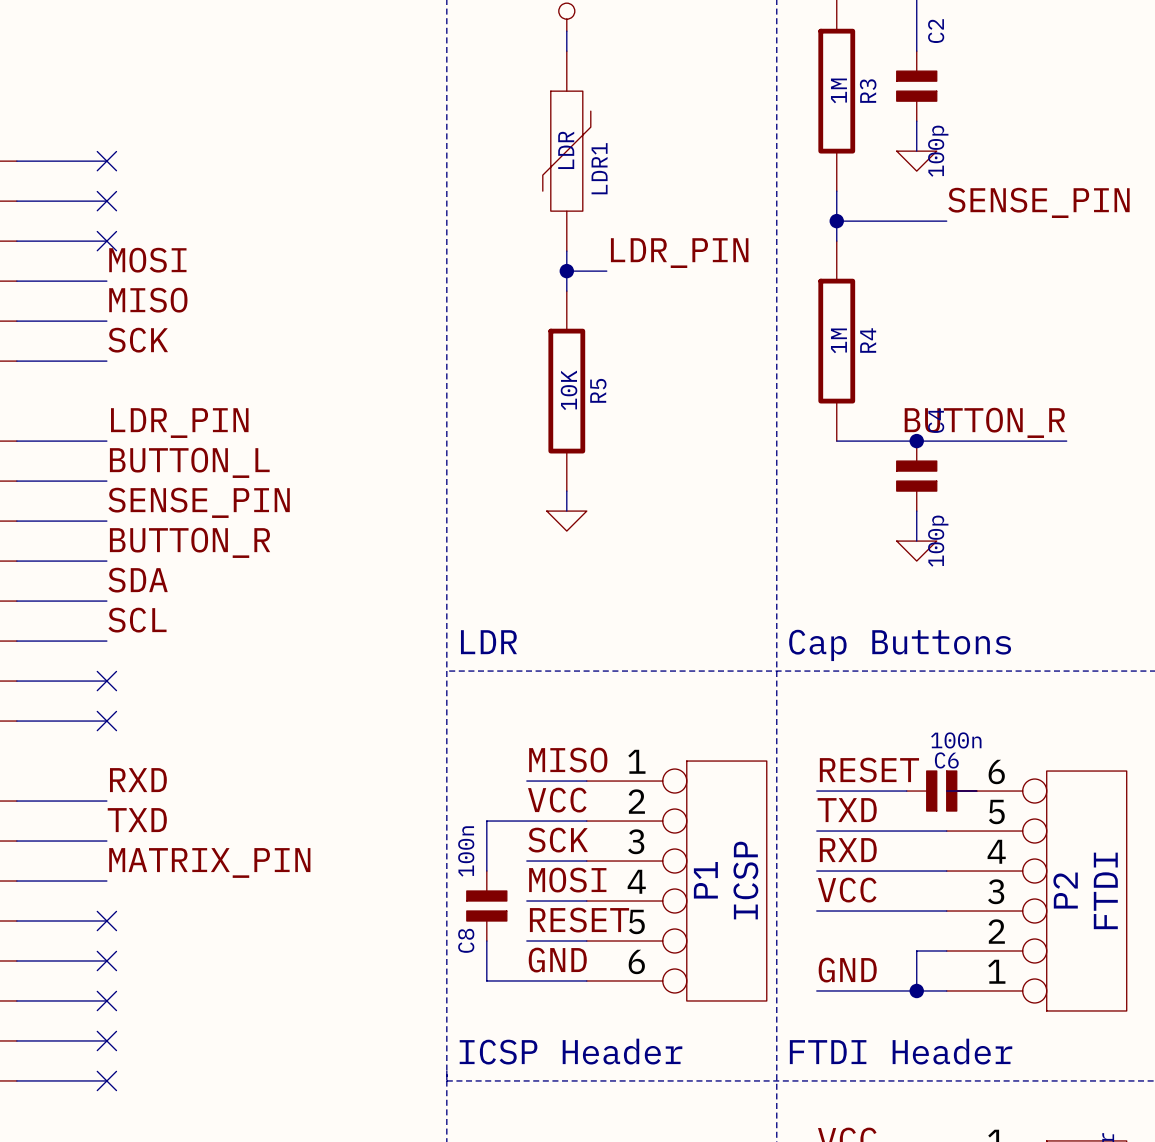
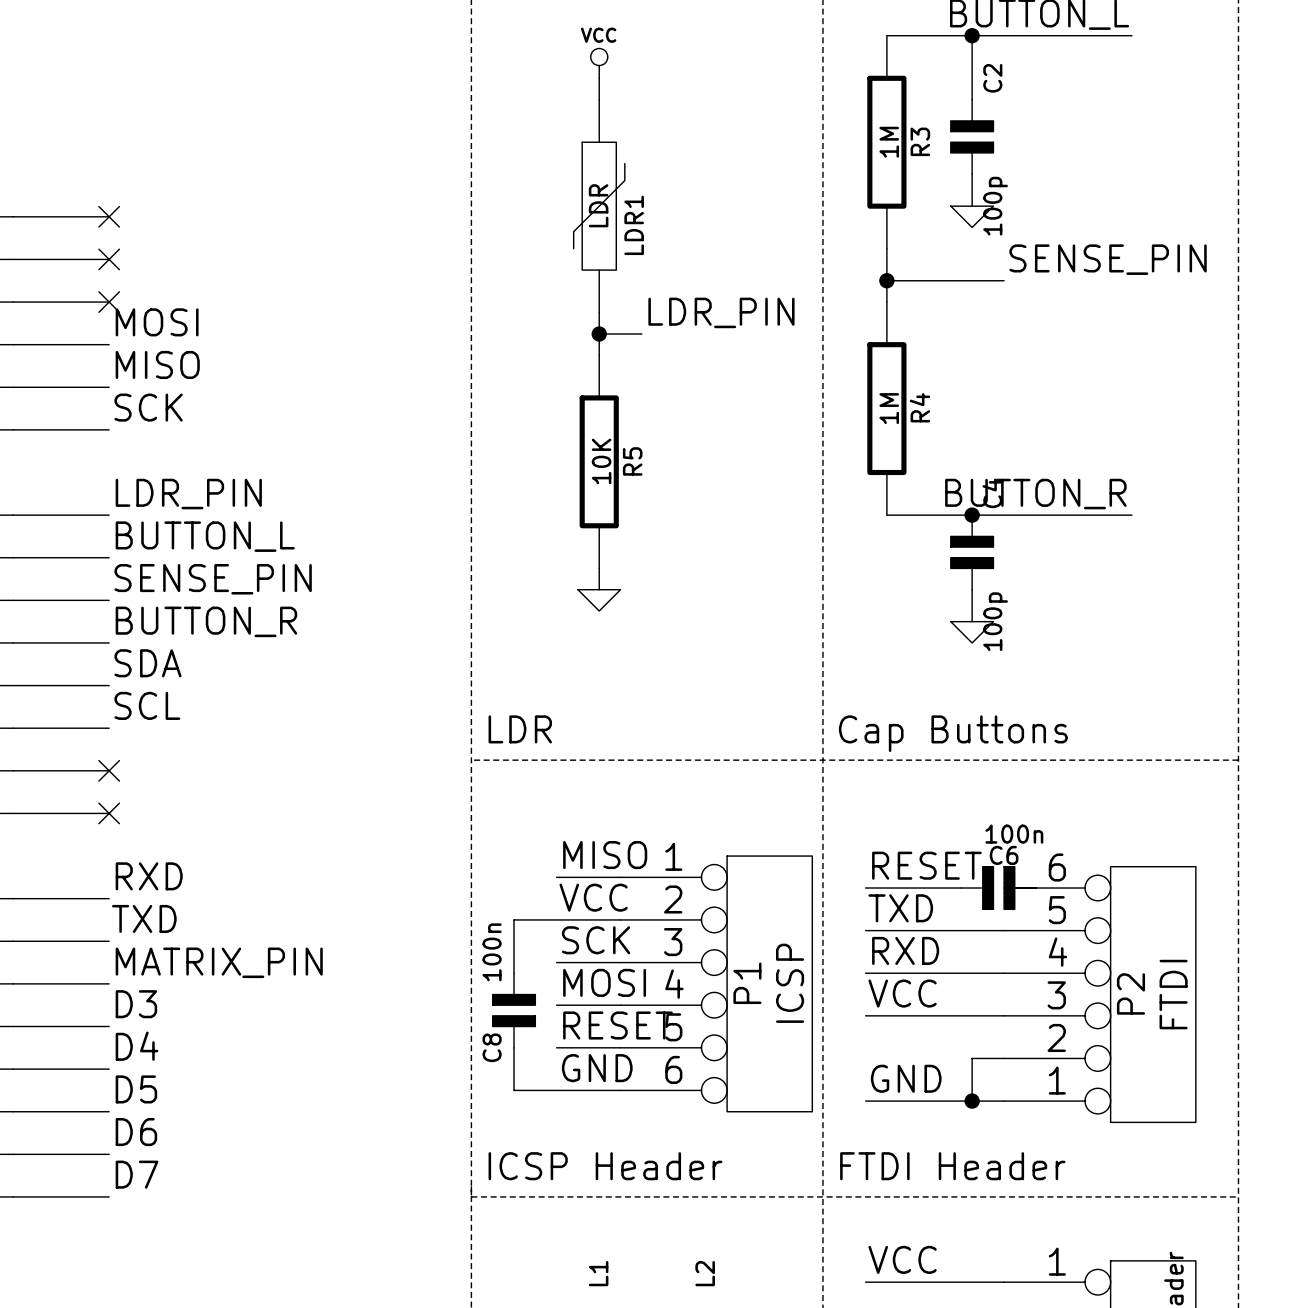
label: none -> D3 (136, 1004)
no-connect mark: (106, 921) -> none
label: none -> D4 (137, 1046)
no-connect mark: (106, 960) -> none
label: none -> D5 (136, 1089)
no-connect mark: (106, 1000) -> none
label: none -> D6 (136, 1132)
no-connect mark: (106, 1040) -> none
label: none -> D7 (137, 1174)
no-connect mark: (106, 1080) -> none

